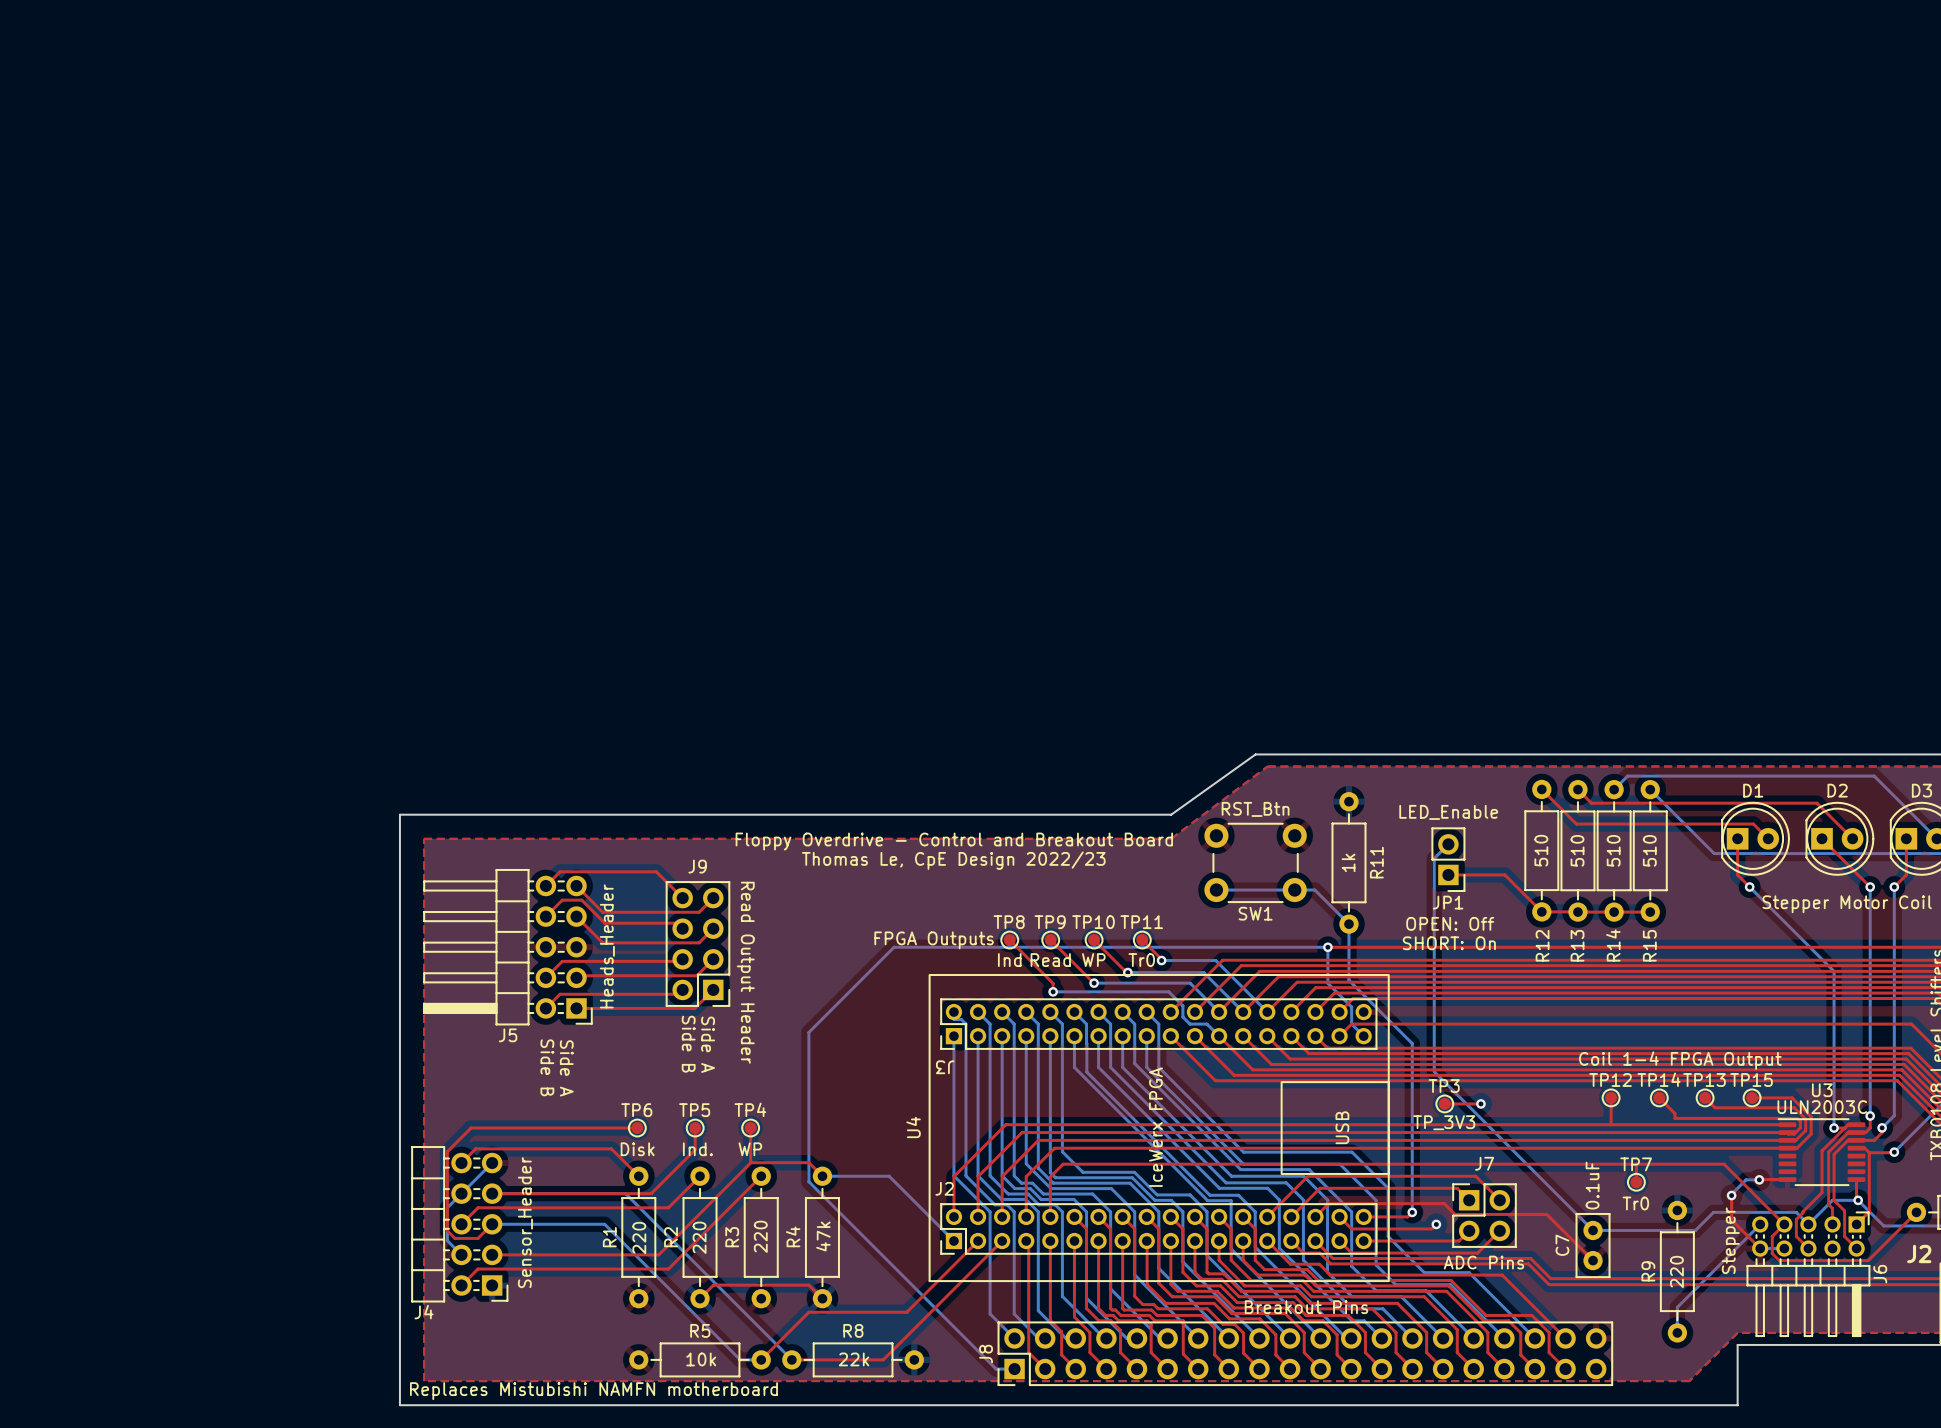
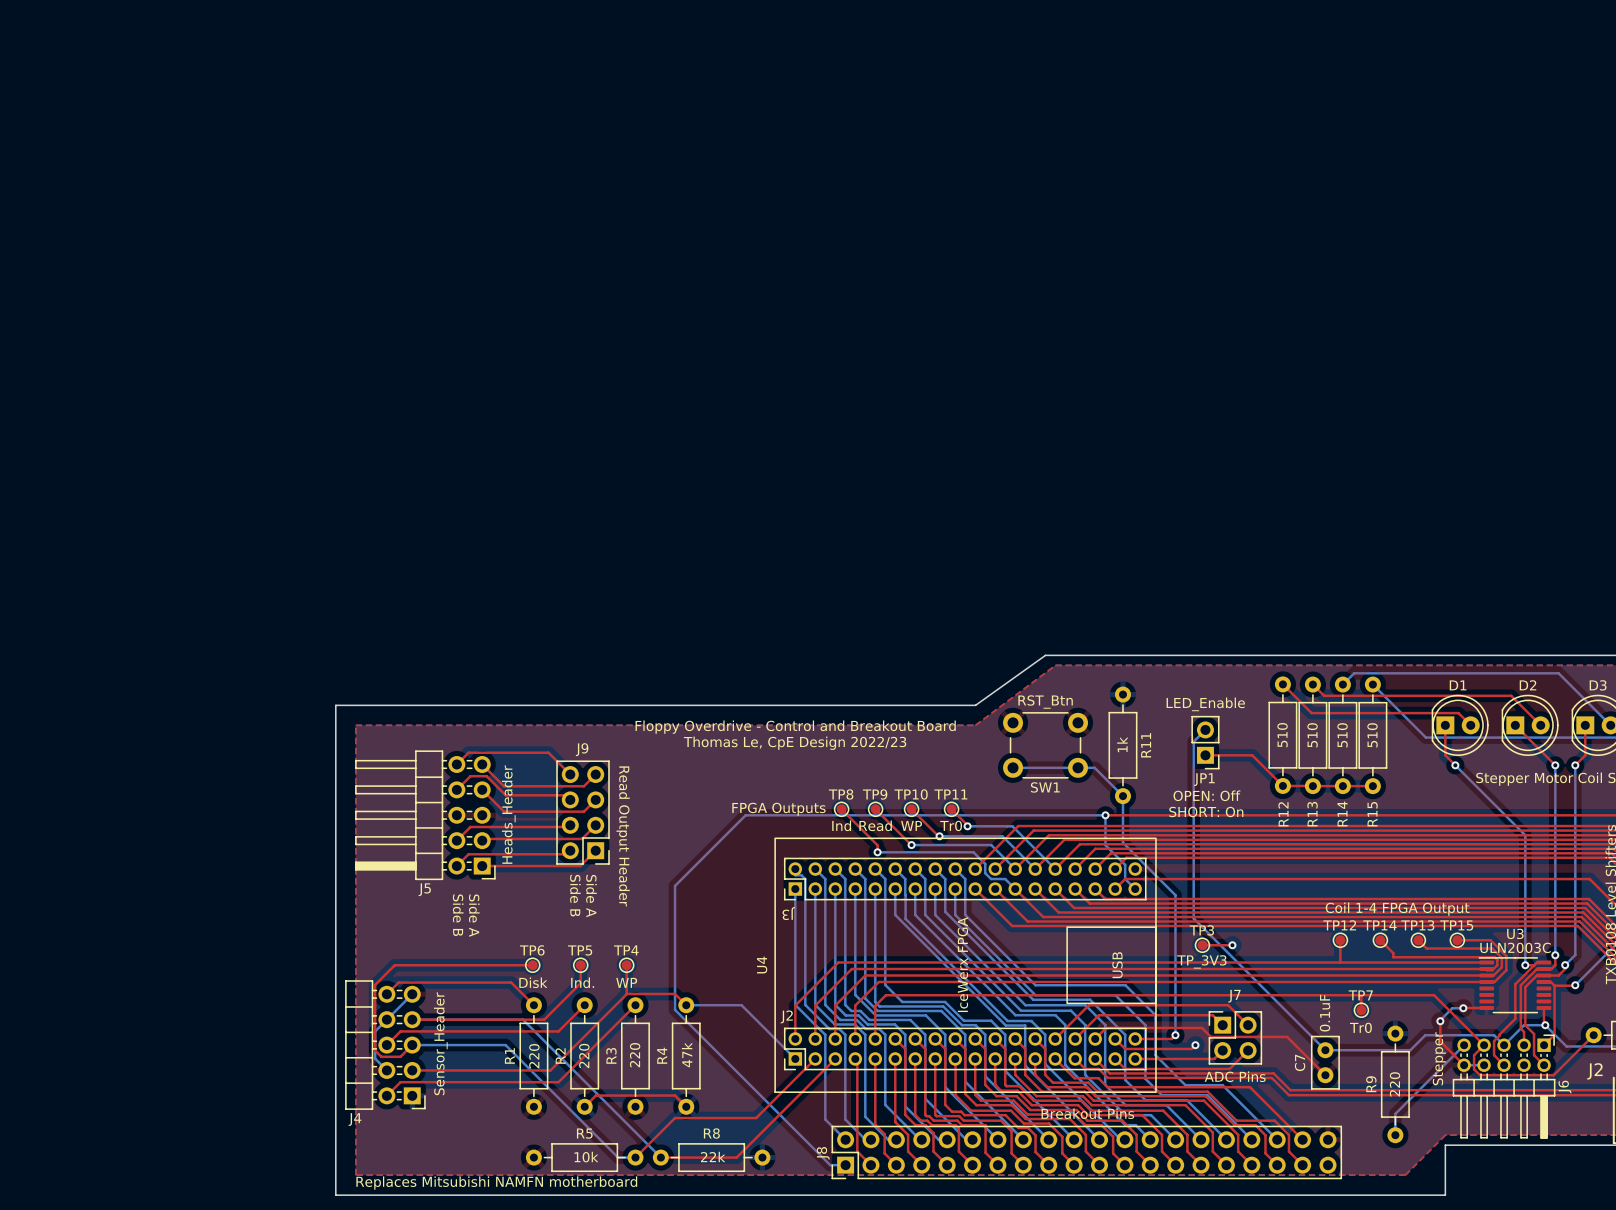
text: Replaces Mistubishi NAMFN motherboard (593, 1391) -> Replaces Mitsubishi NAMFN motherboard (496, 1183)

